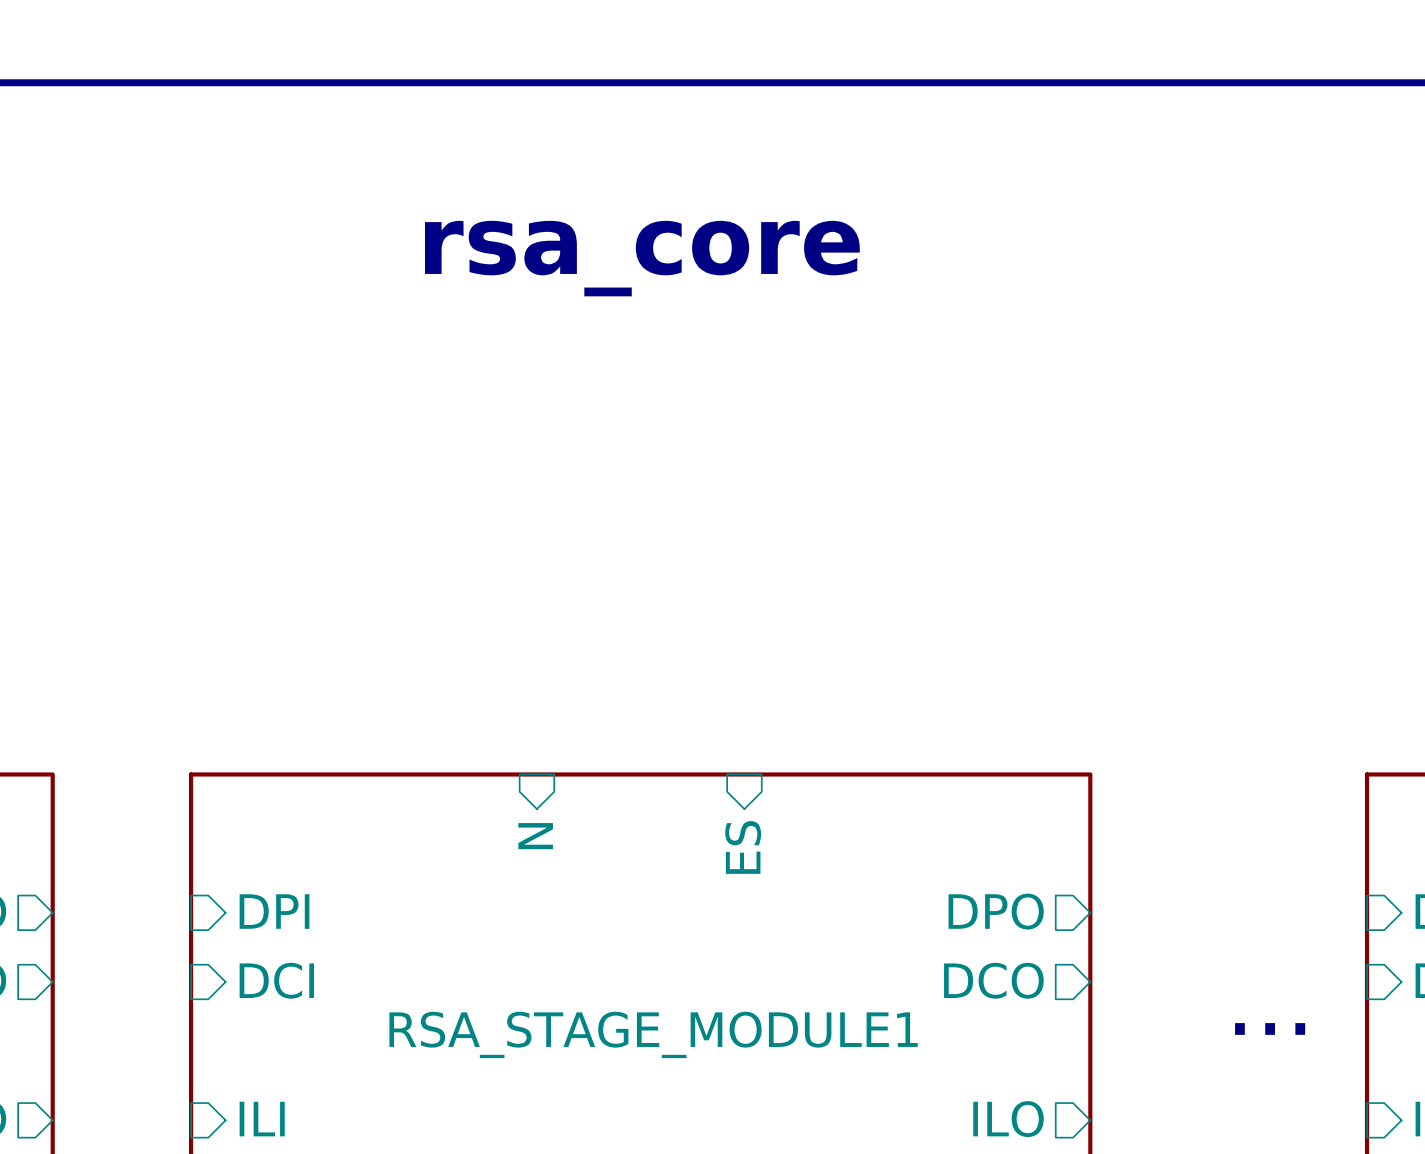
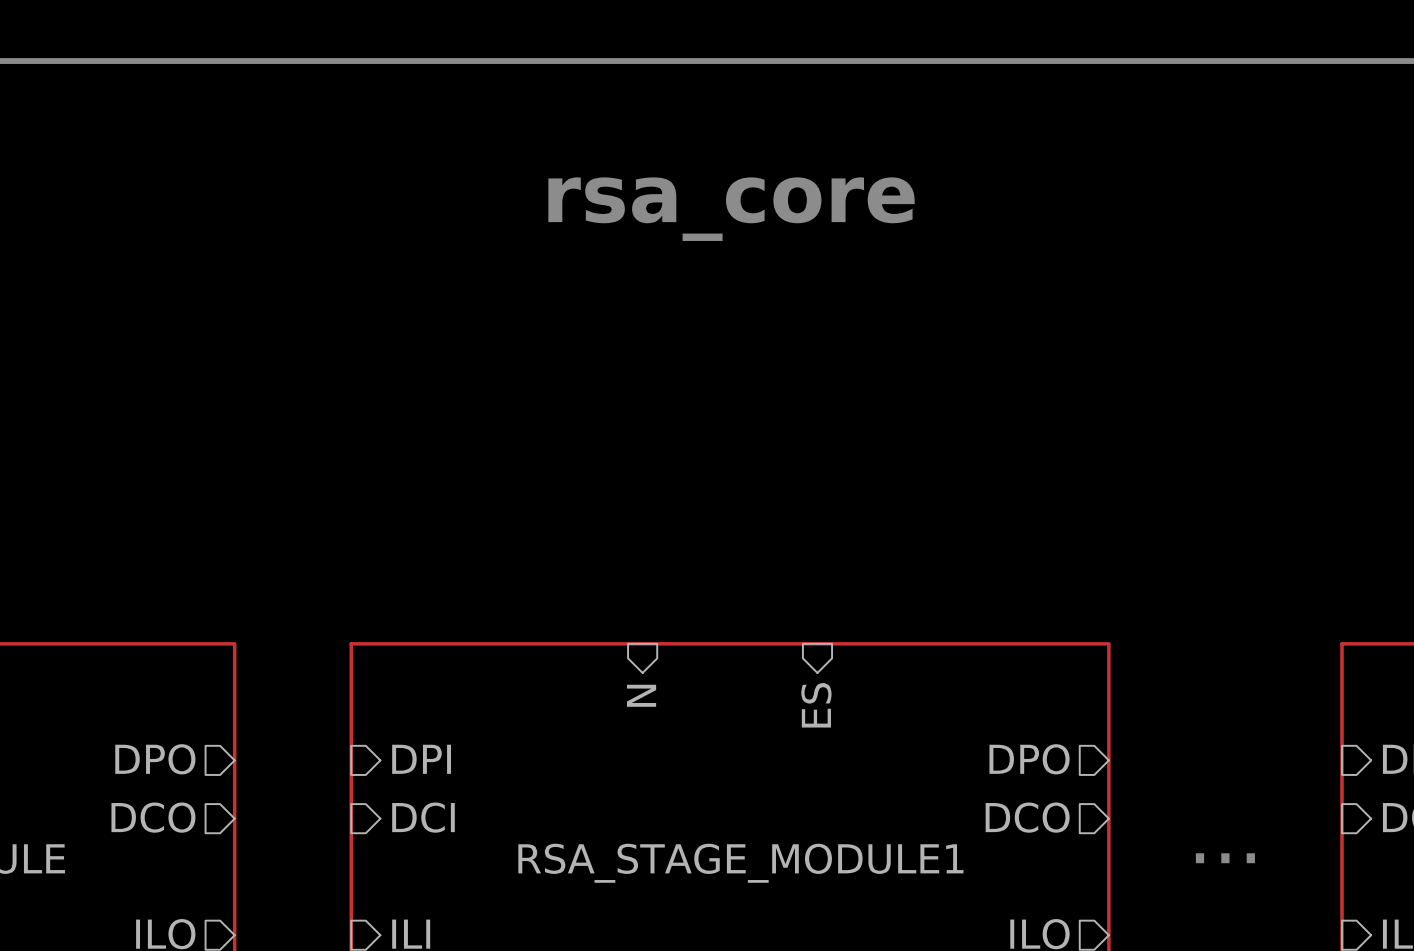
text position: ... (1270, 1028) -> ... (1225, 858)

